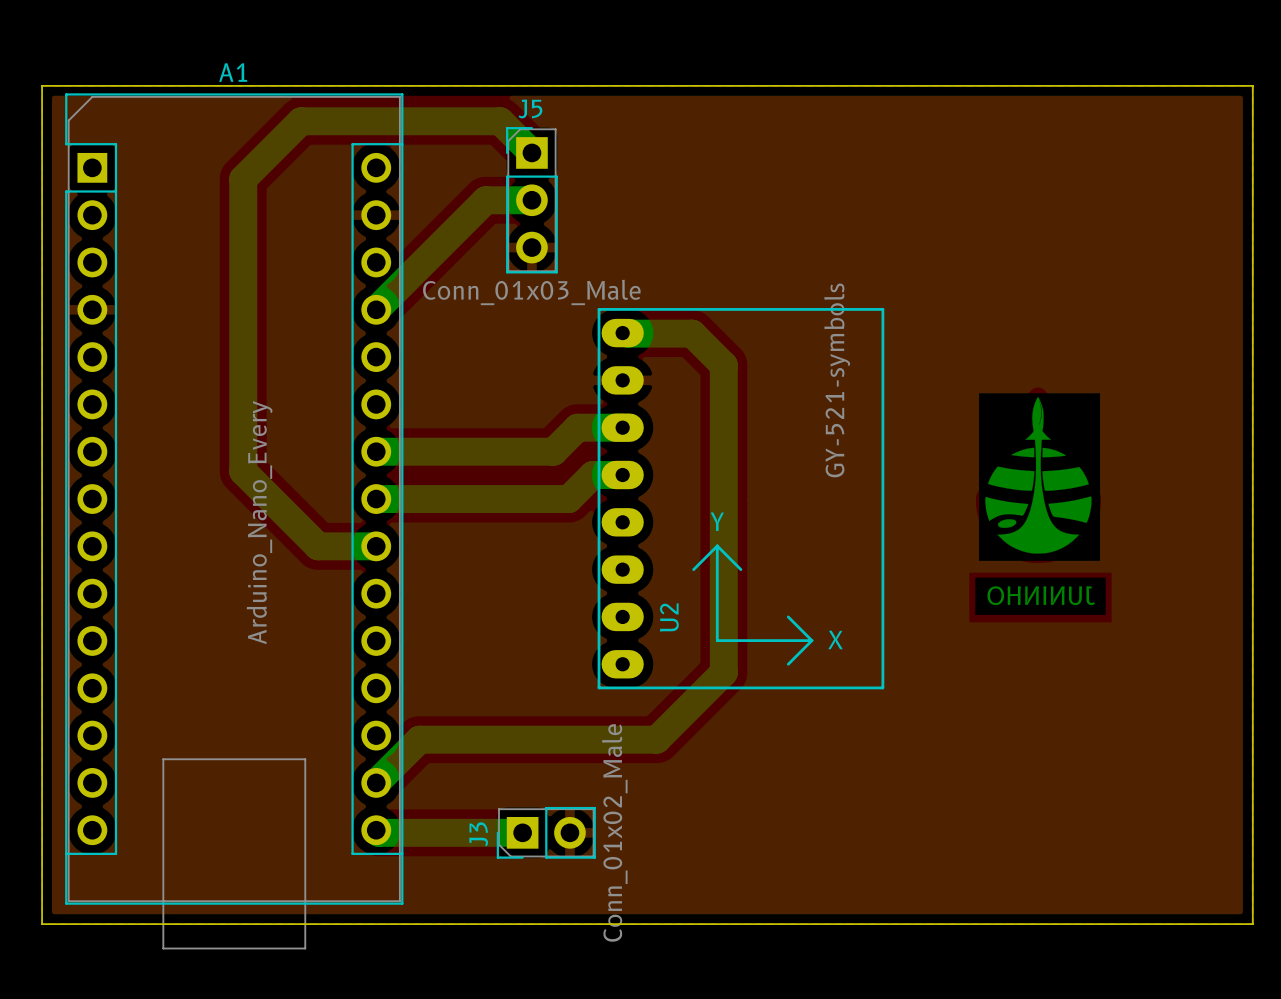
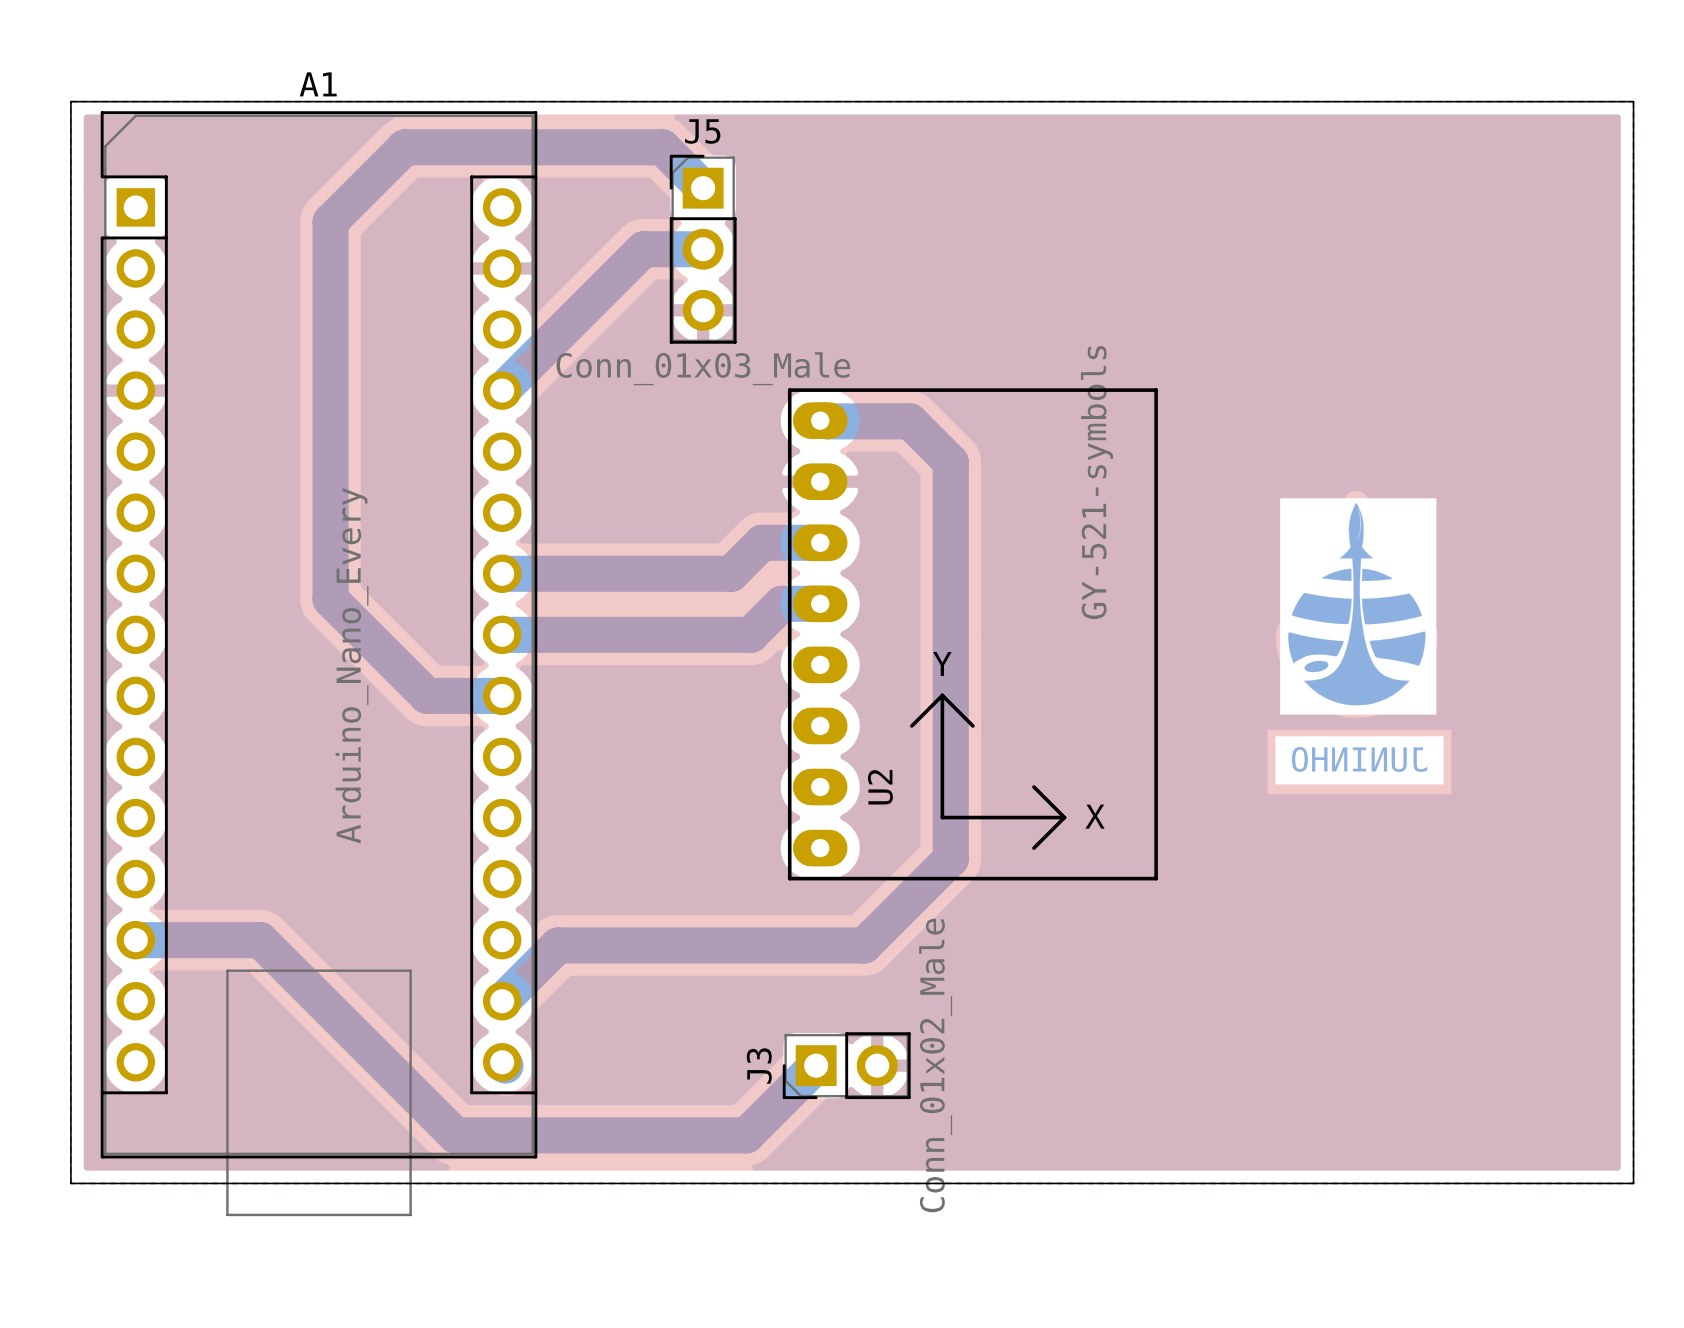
bottom track: none -> (135, 940) (260, 940) (455, 1135) (746, 1135) (816, 1065)
bottom track: (378, 832) (522, 832) -> none
J3 position: (546, 832) -> (846, 1065)

